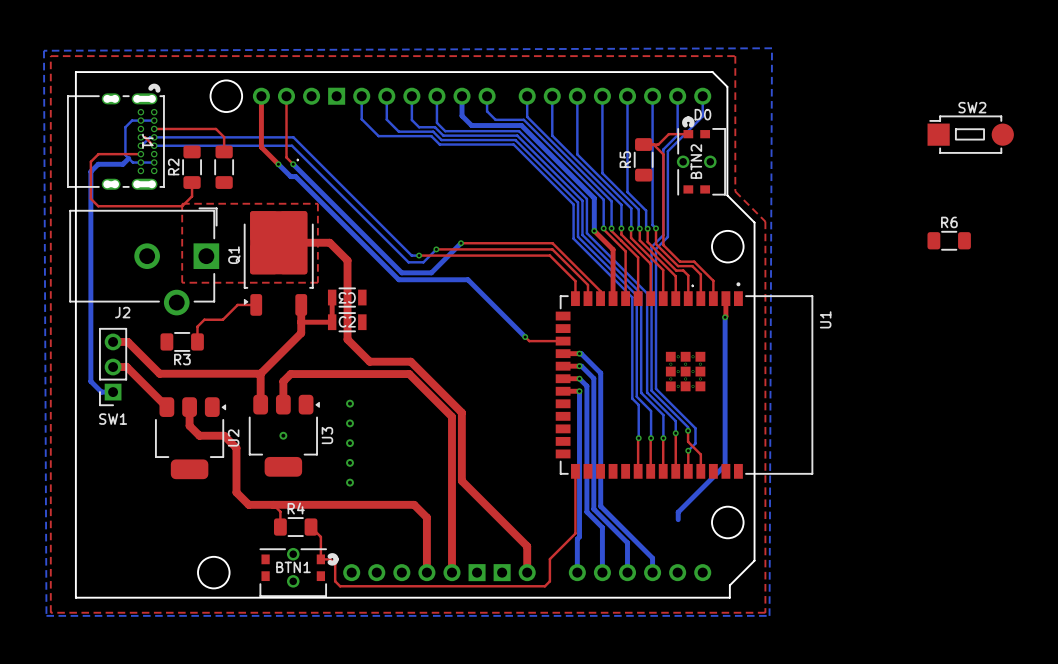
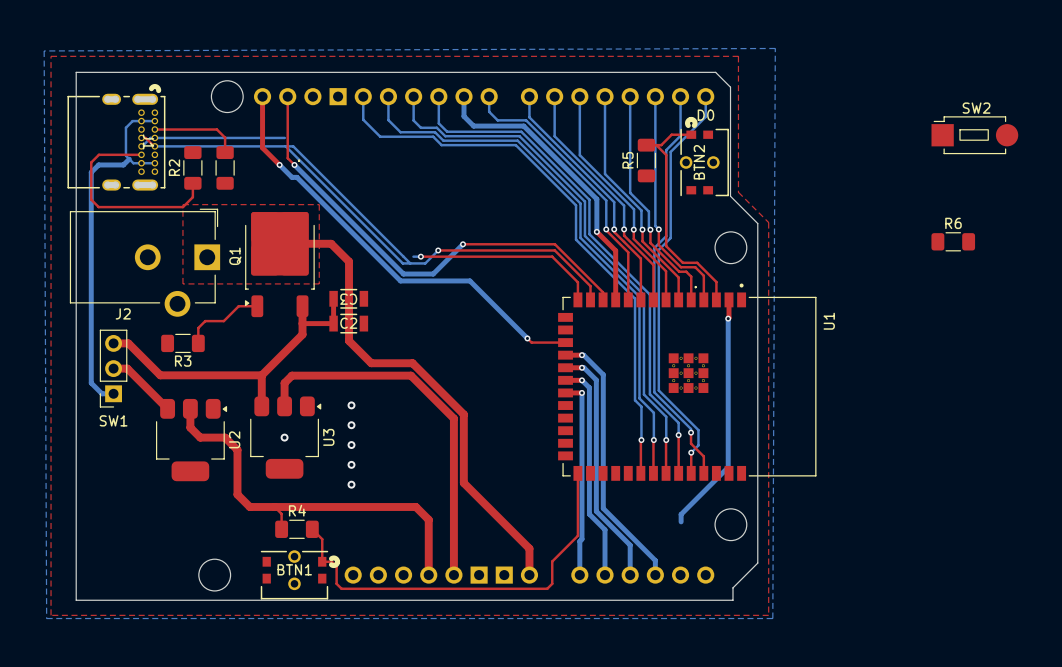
bottom track: (283, 137) (293, 137) (411, 255) -> none
bottom track: none -> (285, 146) (402, 263) (410, 263)

